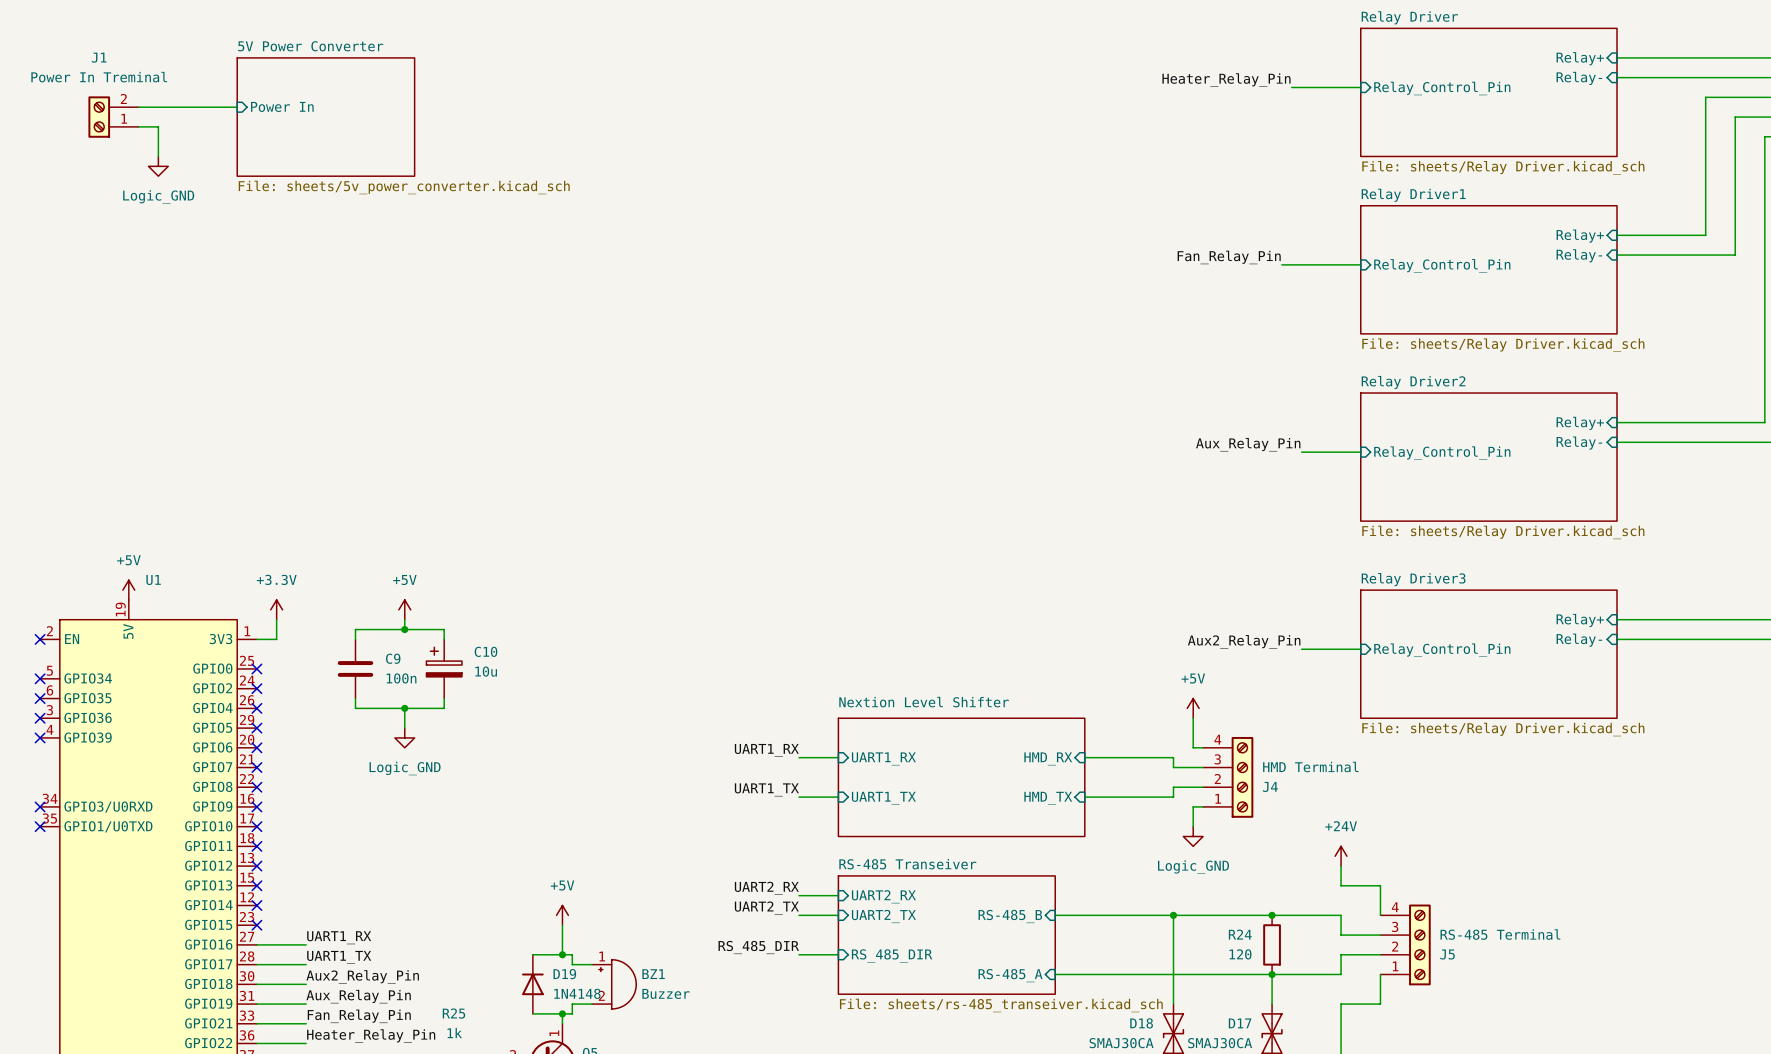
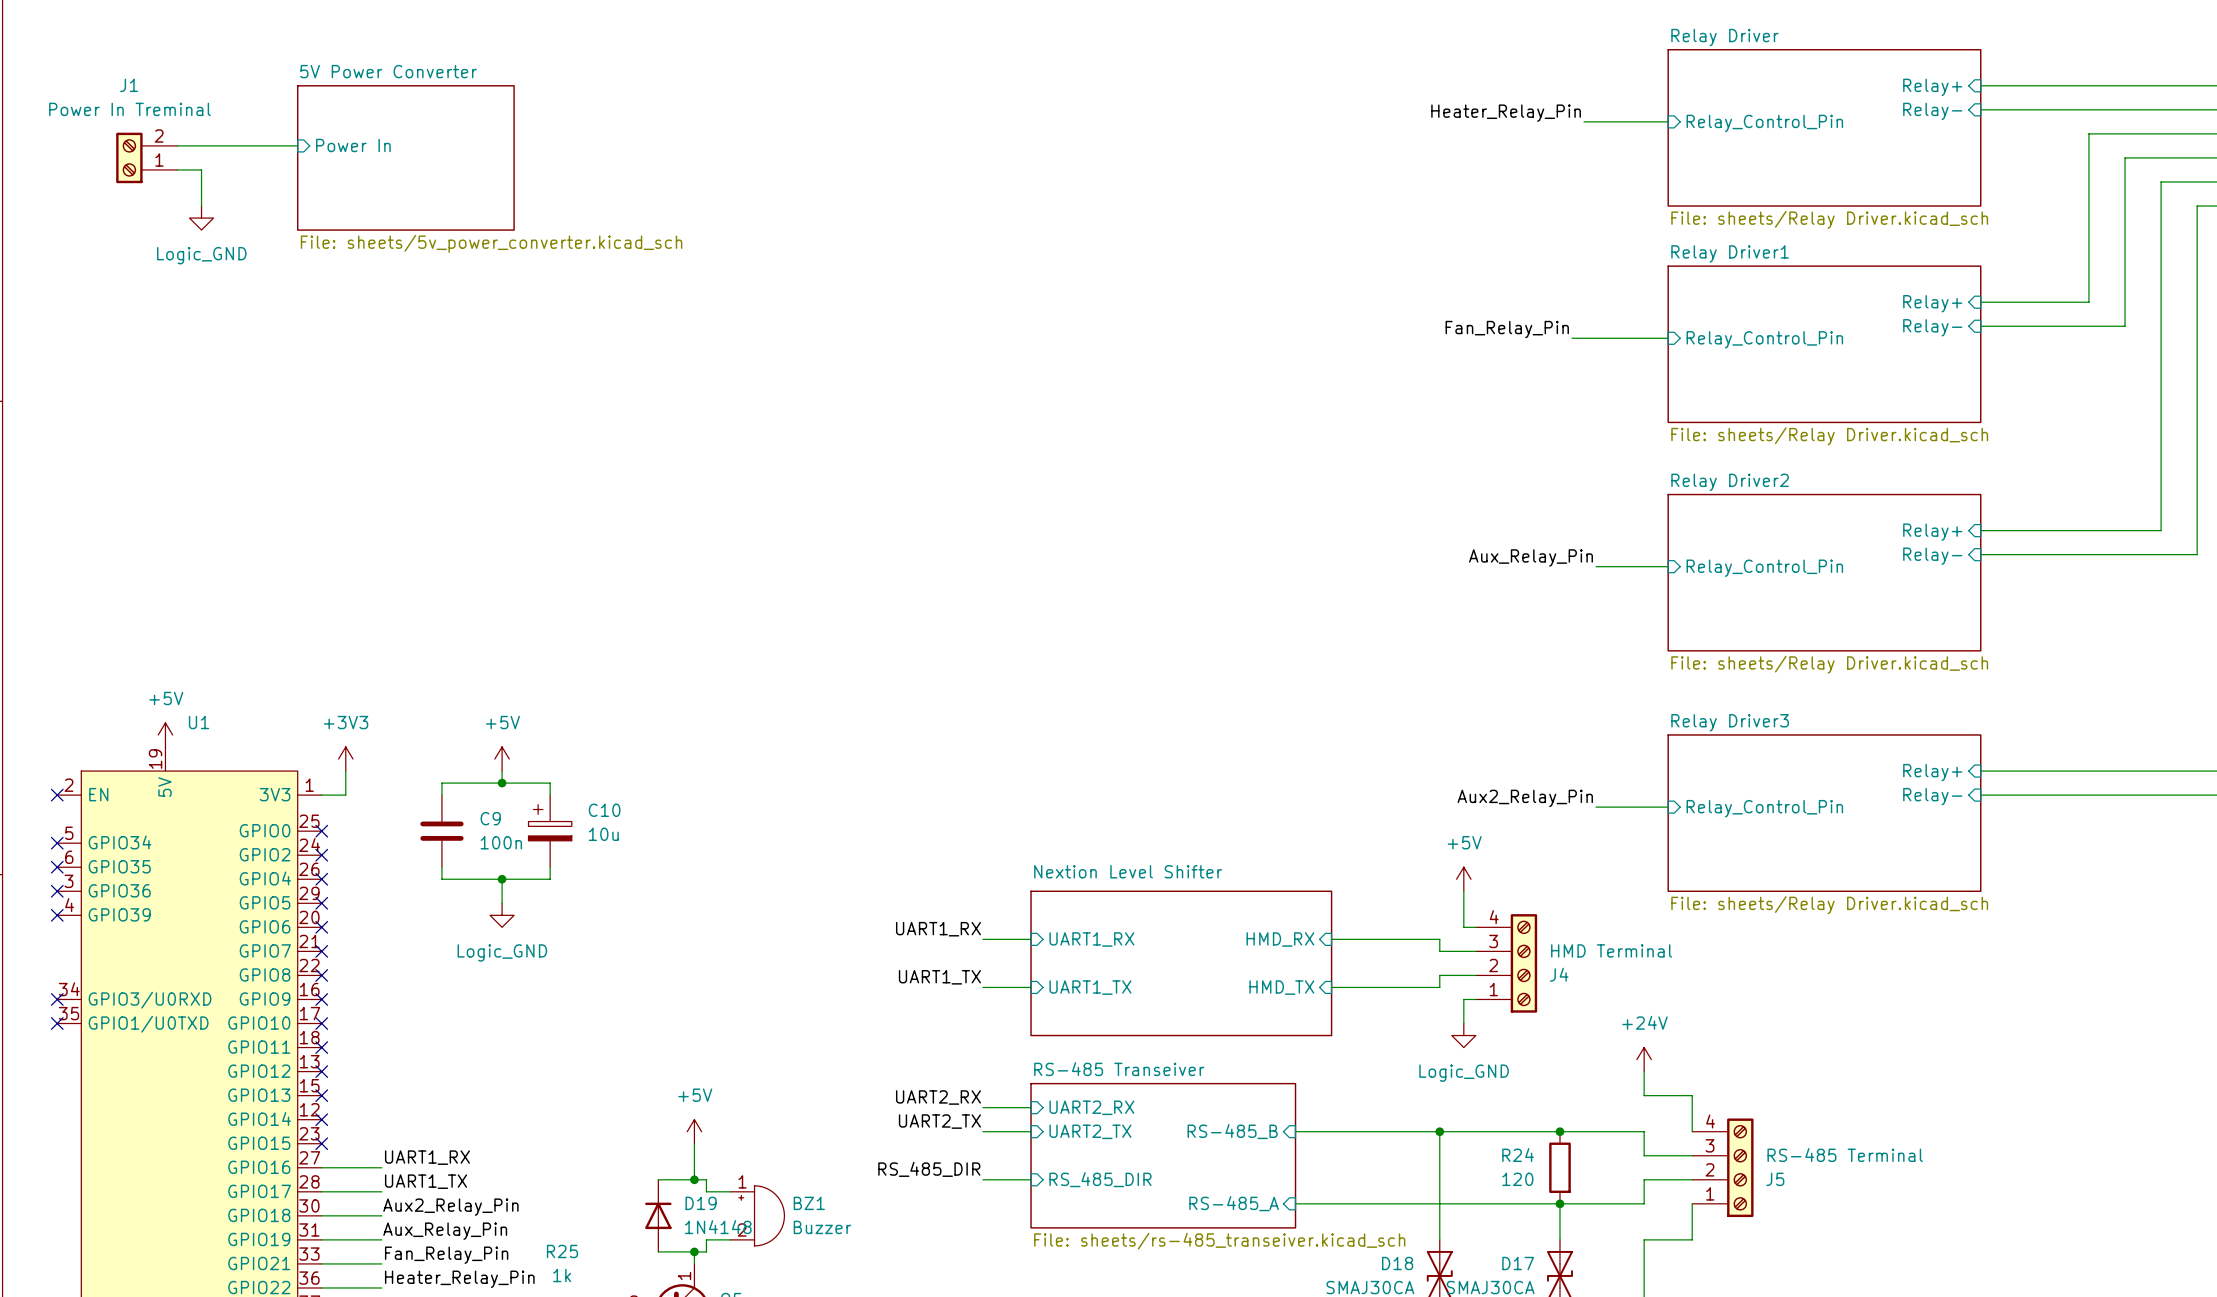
power symbol: +3.3V (276, 609) -> +3V3 (345, 759)

